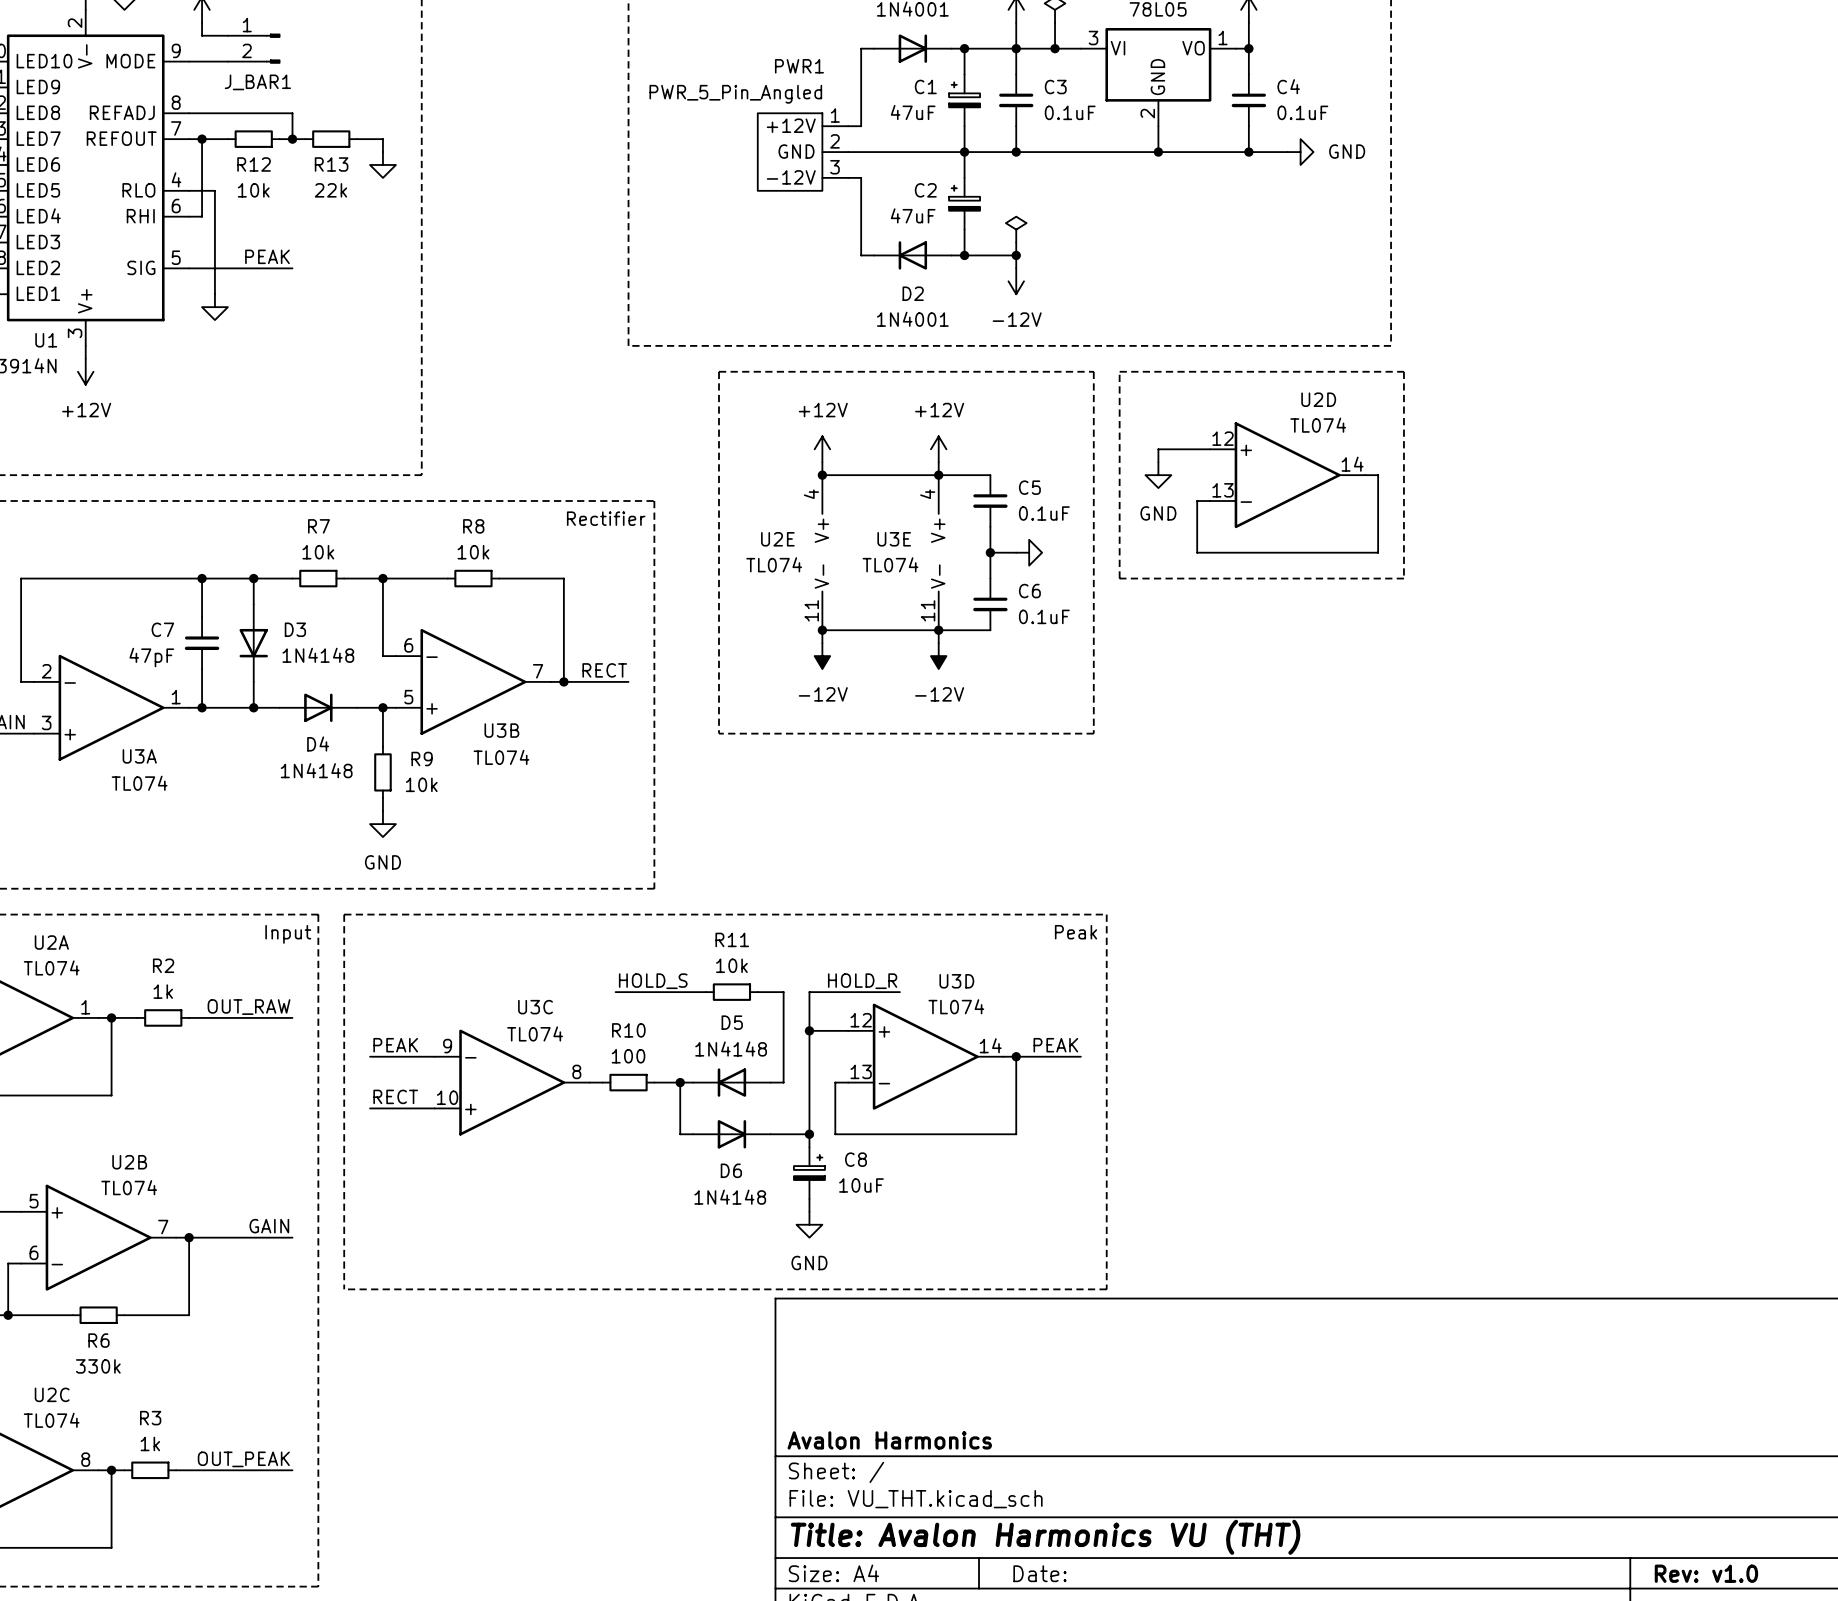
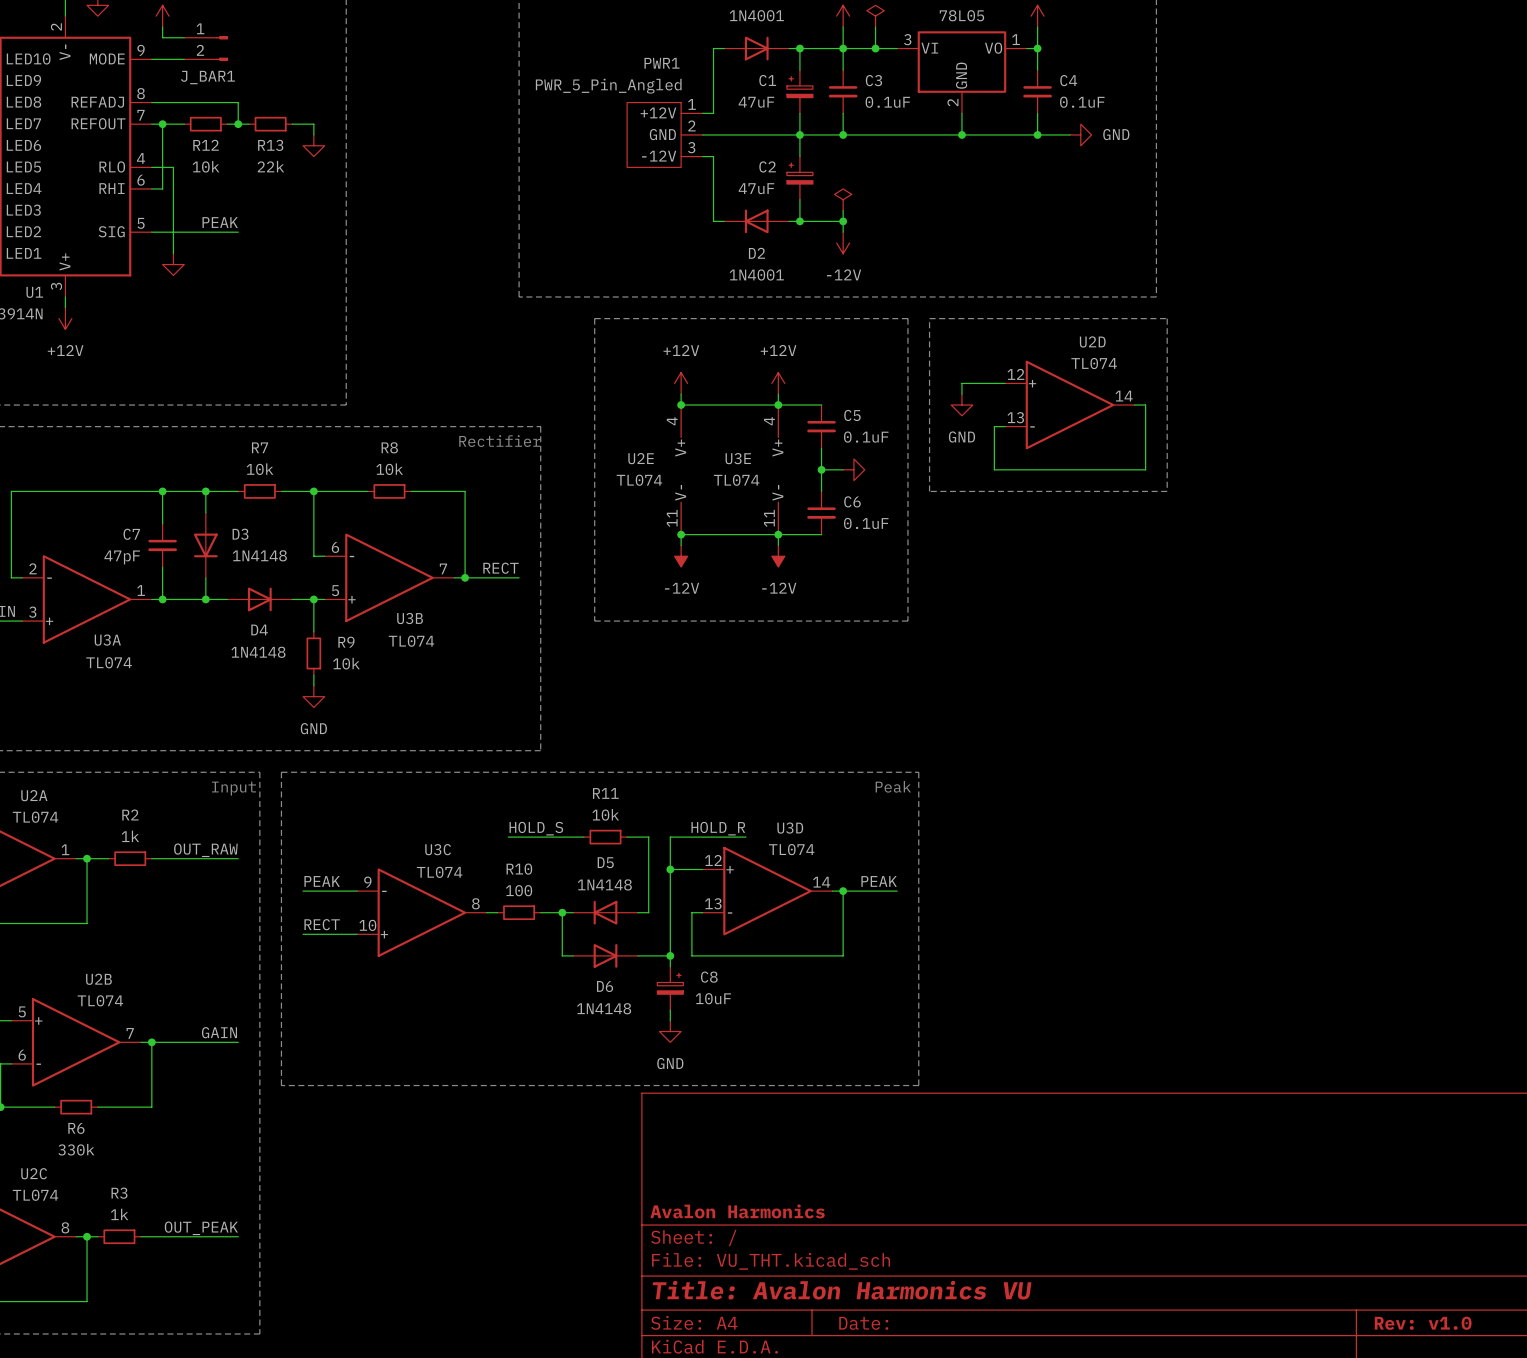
title block: Title: Avalon Harmonics VU (THT) (1045, 1537) -> Title: Avalon Harmonics VU (842, 1290)

